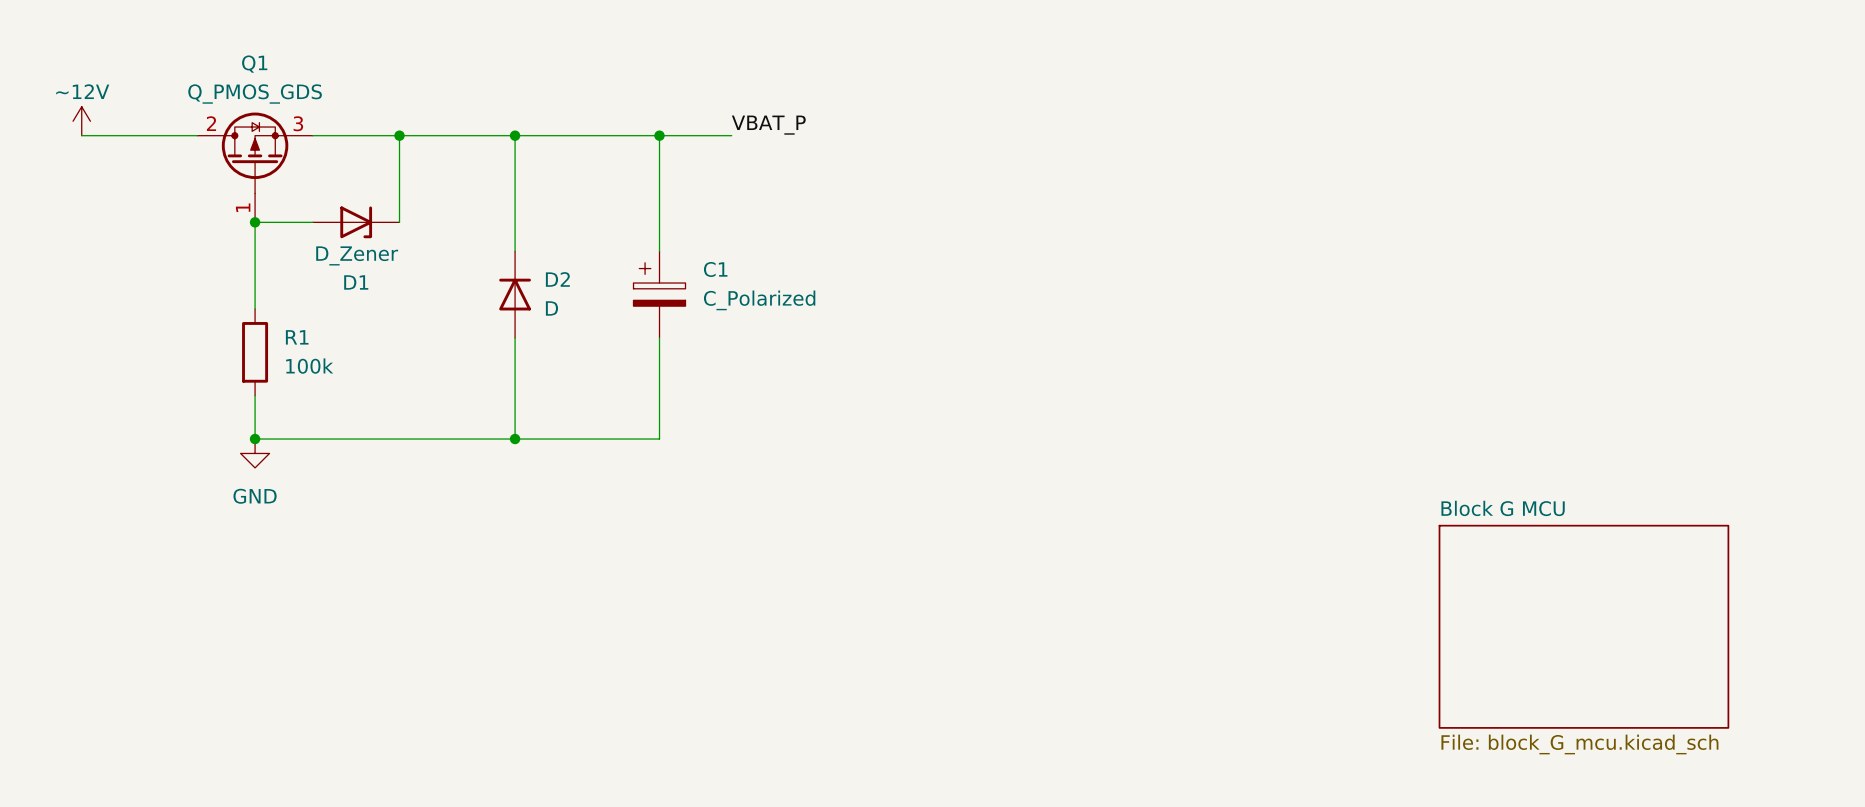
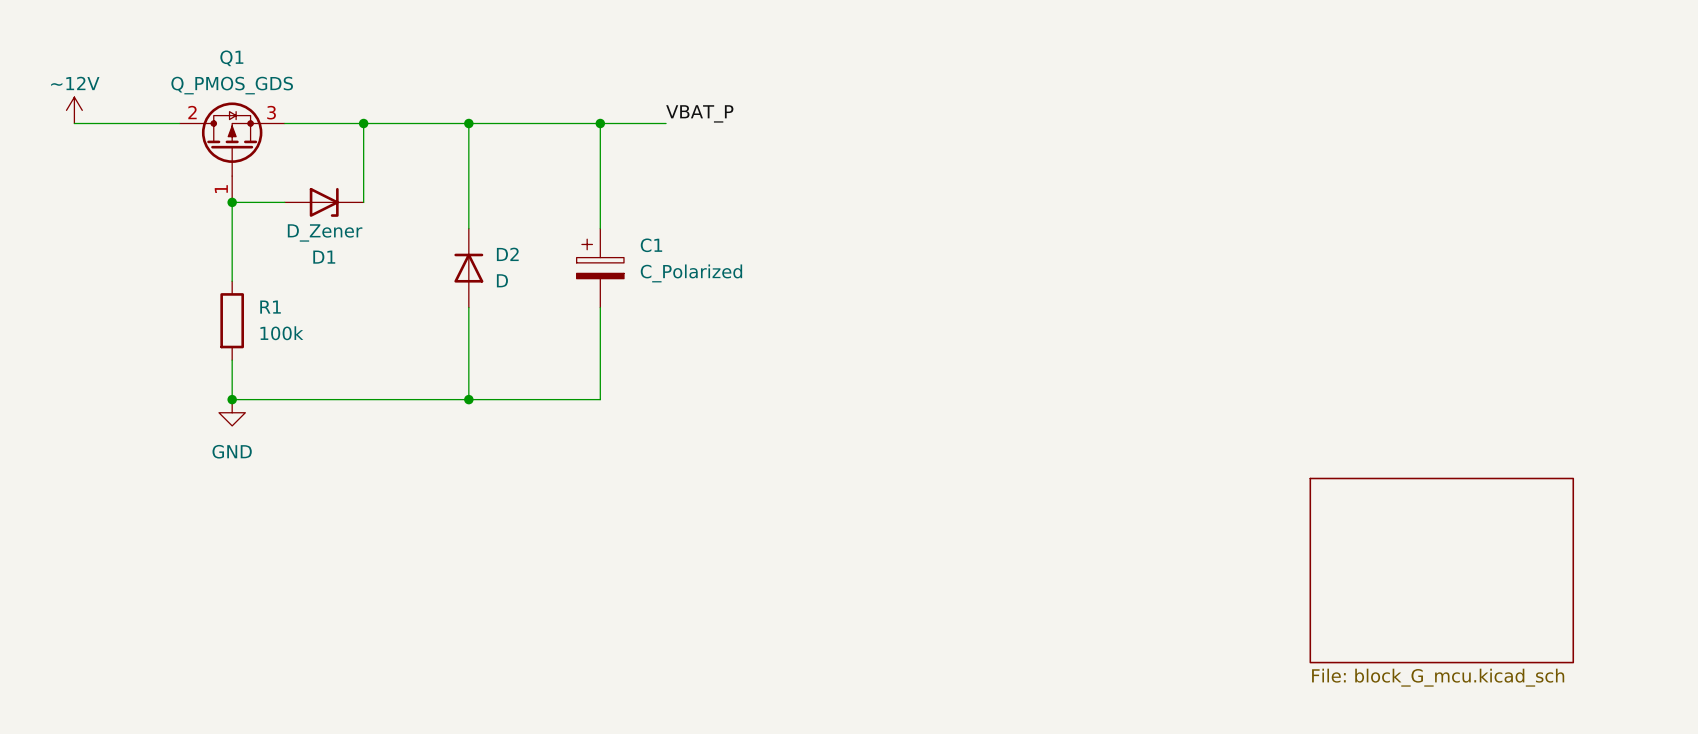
sheet Block G MCU name: Block G MCU (1503, 508) -> none

